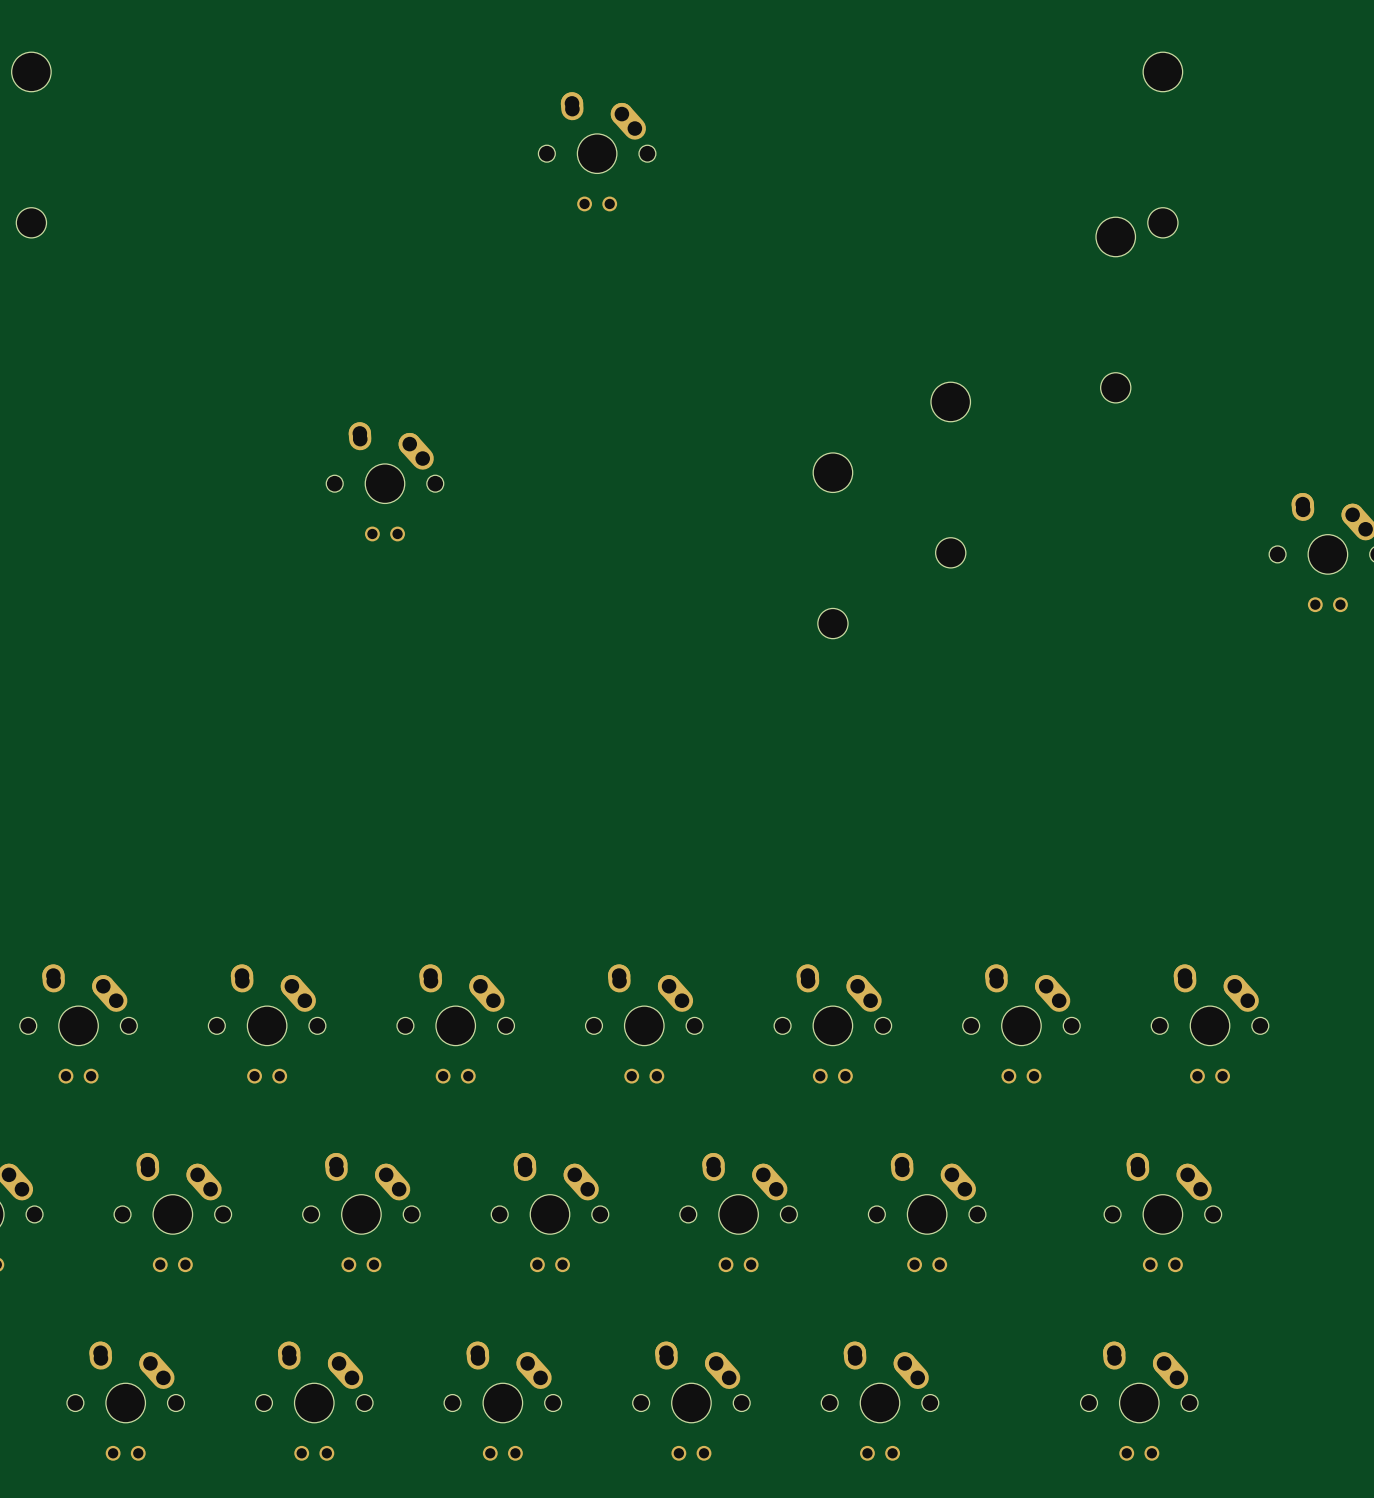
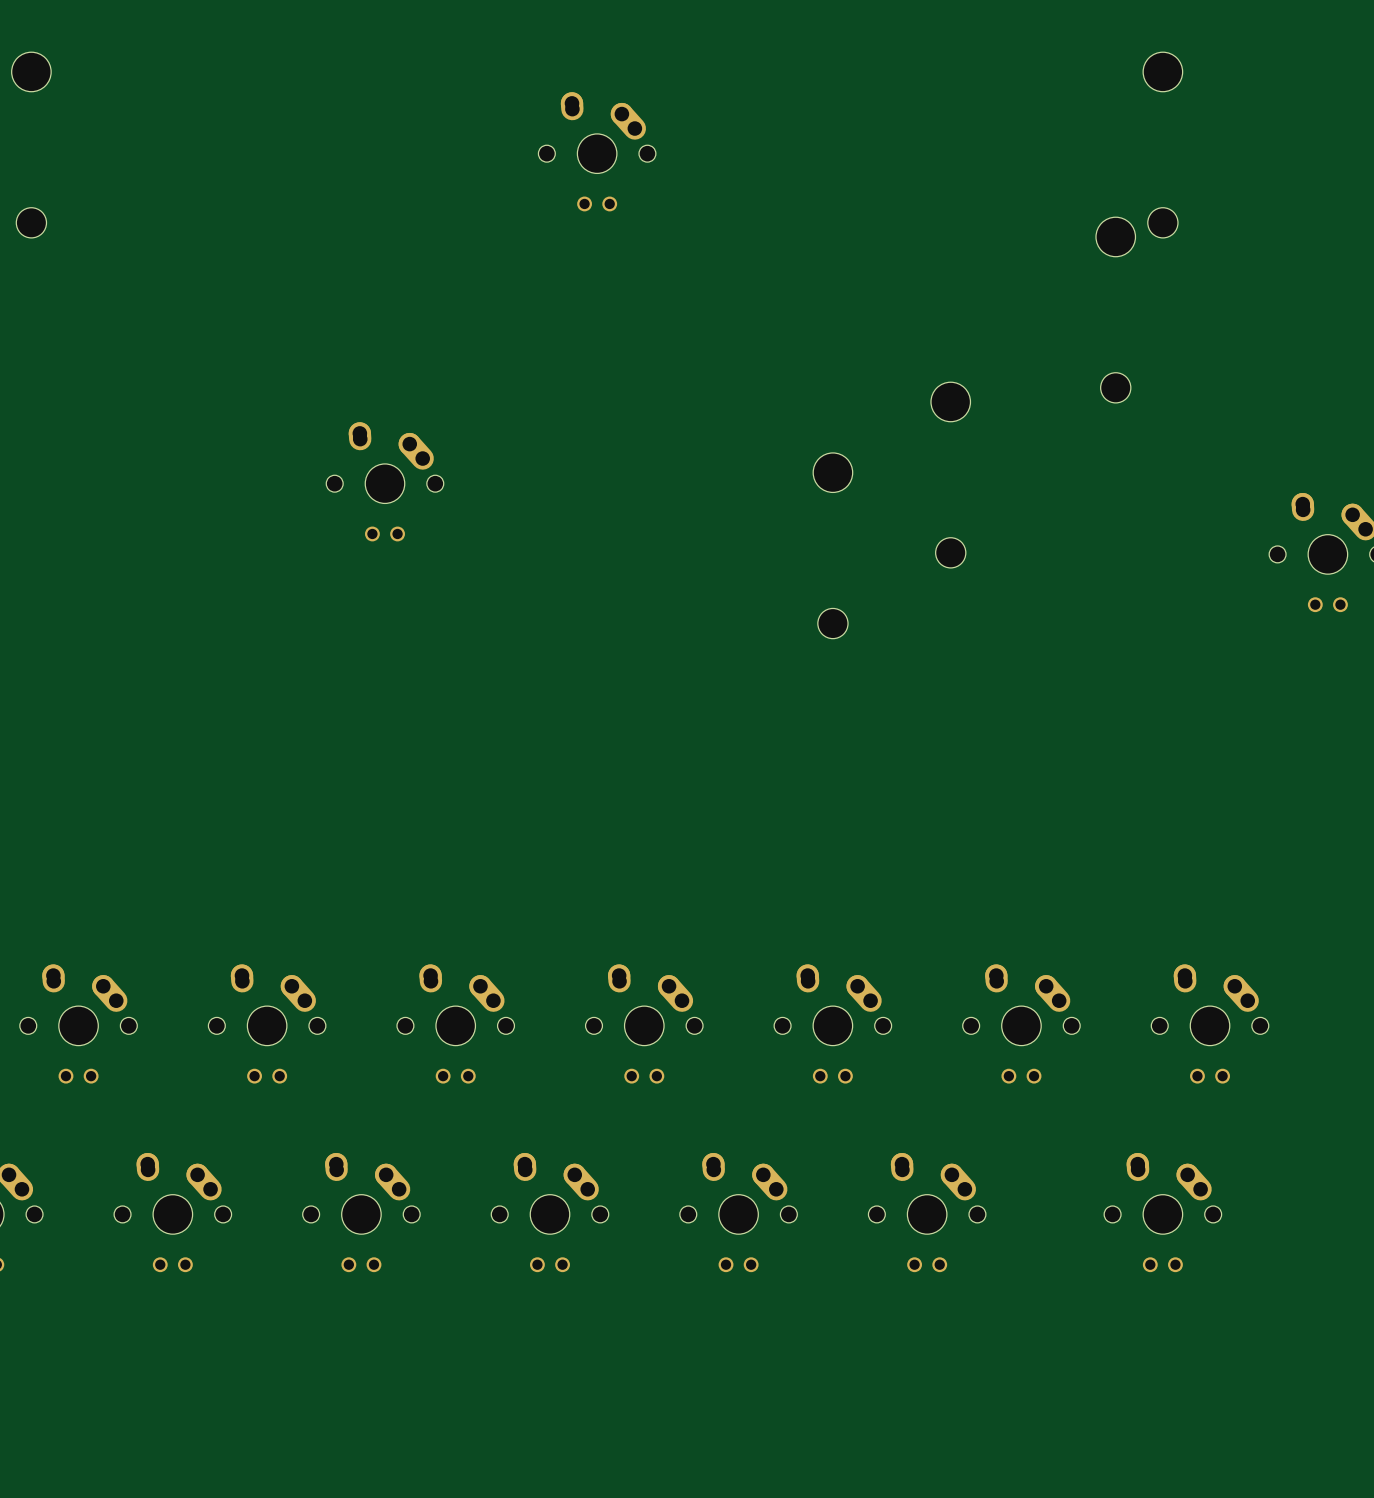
part: (125, 1401) -> none
part: (314, 1401) -> none
part: (502, 1401) -> none
part: (691, 1401) -> none
part: (880, 1401) -> none
part: (1139, 1401) -> none

